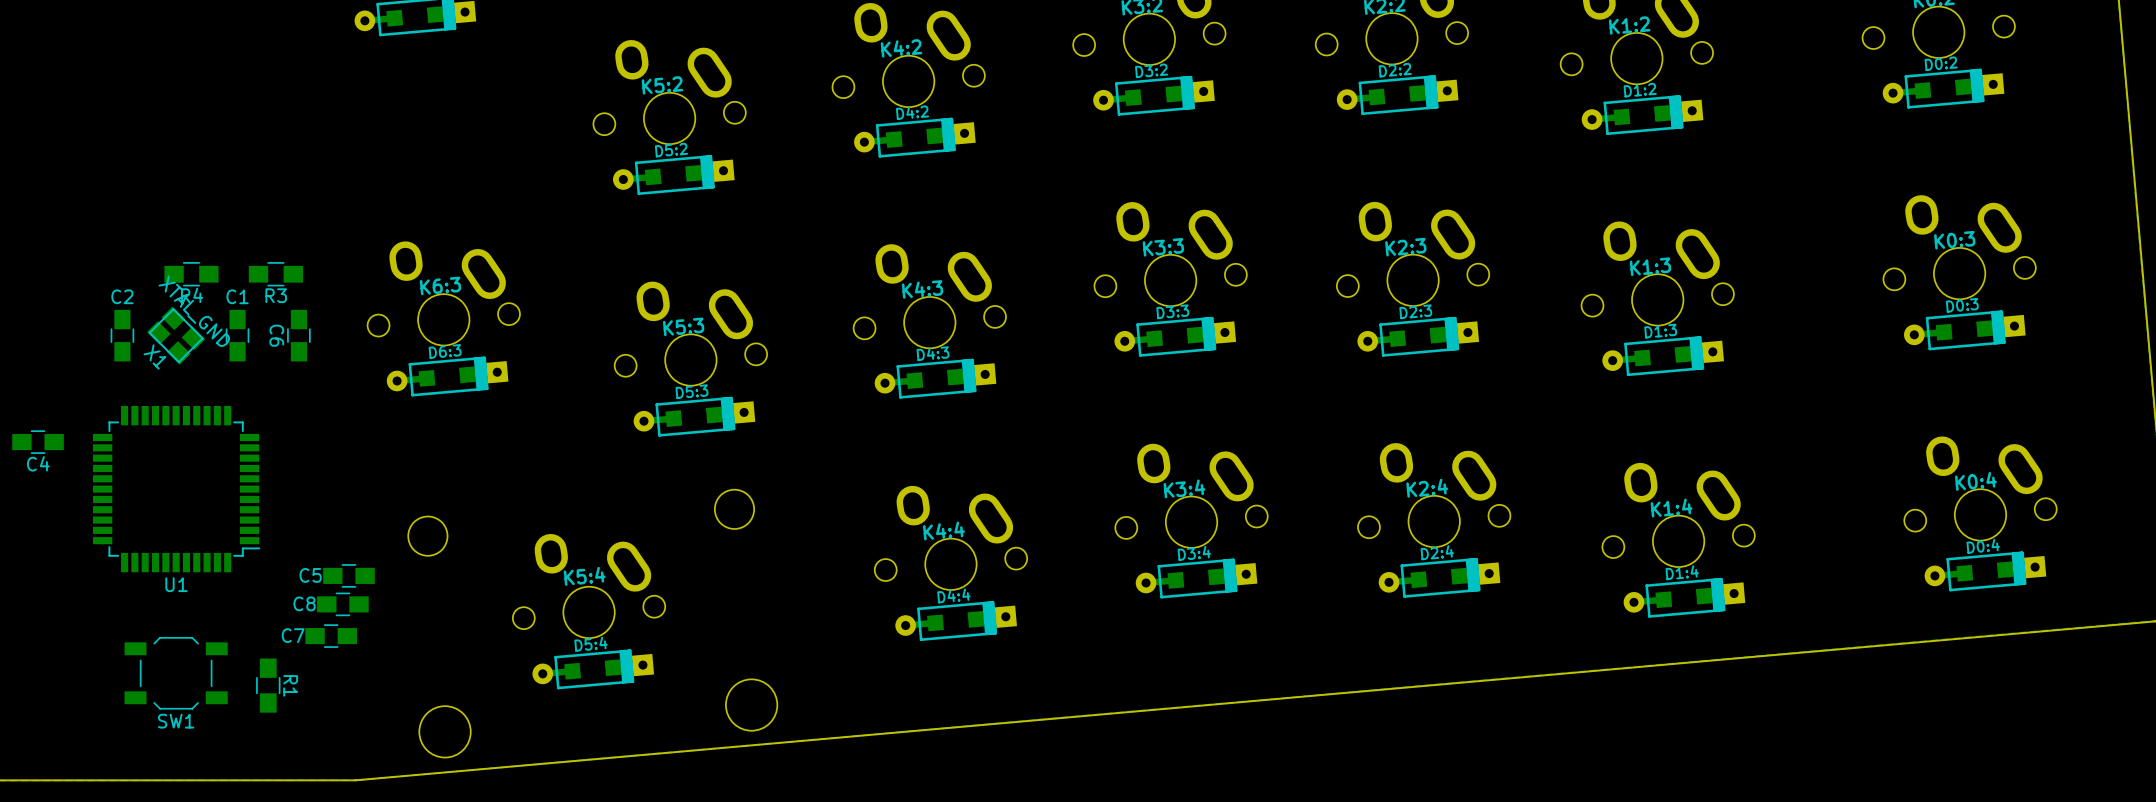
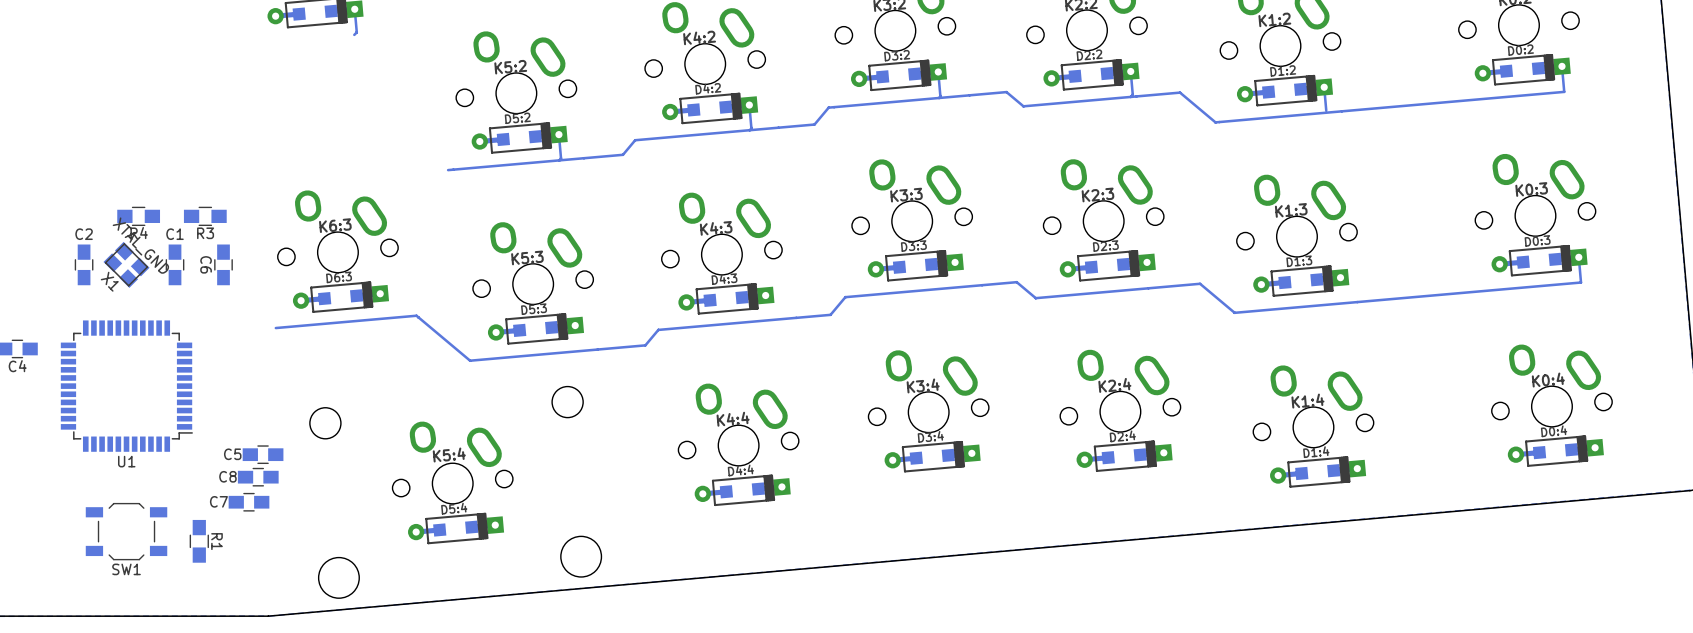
track: none -> (354, 9) (356, 32) (354, 34)
track: none -> (1562, 66) (1564, 91) (1215, 122) (1180, 92) (1023, 106)
track: none -> (1130, 71) (1132, 94) (1130, 96)
track: none -> (938, 71) (939, 97)
track: none -> (1324, 87) (1326, 110)
track: none -> (749, 105) (751, 127) (749, 130)
track: none -> (1023, 106) (1006, 92) (828, 107) (814, 124) (635, 140)
track: none -> (558, 134) (560, 157) (559, 160)
track: none -> (635, 140) (622, 154) (448, 170)
track: none -> (1578, 257) (1581, 282) (1234, 312) (1200, 283) (1035, 298)
track: none -> (845, 297) (1016, 282) (1035, 298)
track: none -> (845, 297) (830, 314) (658, 329)
track: none -> (275, 328) (416, 315) (470, 360) (645, 345) (658, 329)

